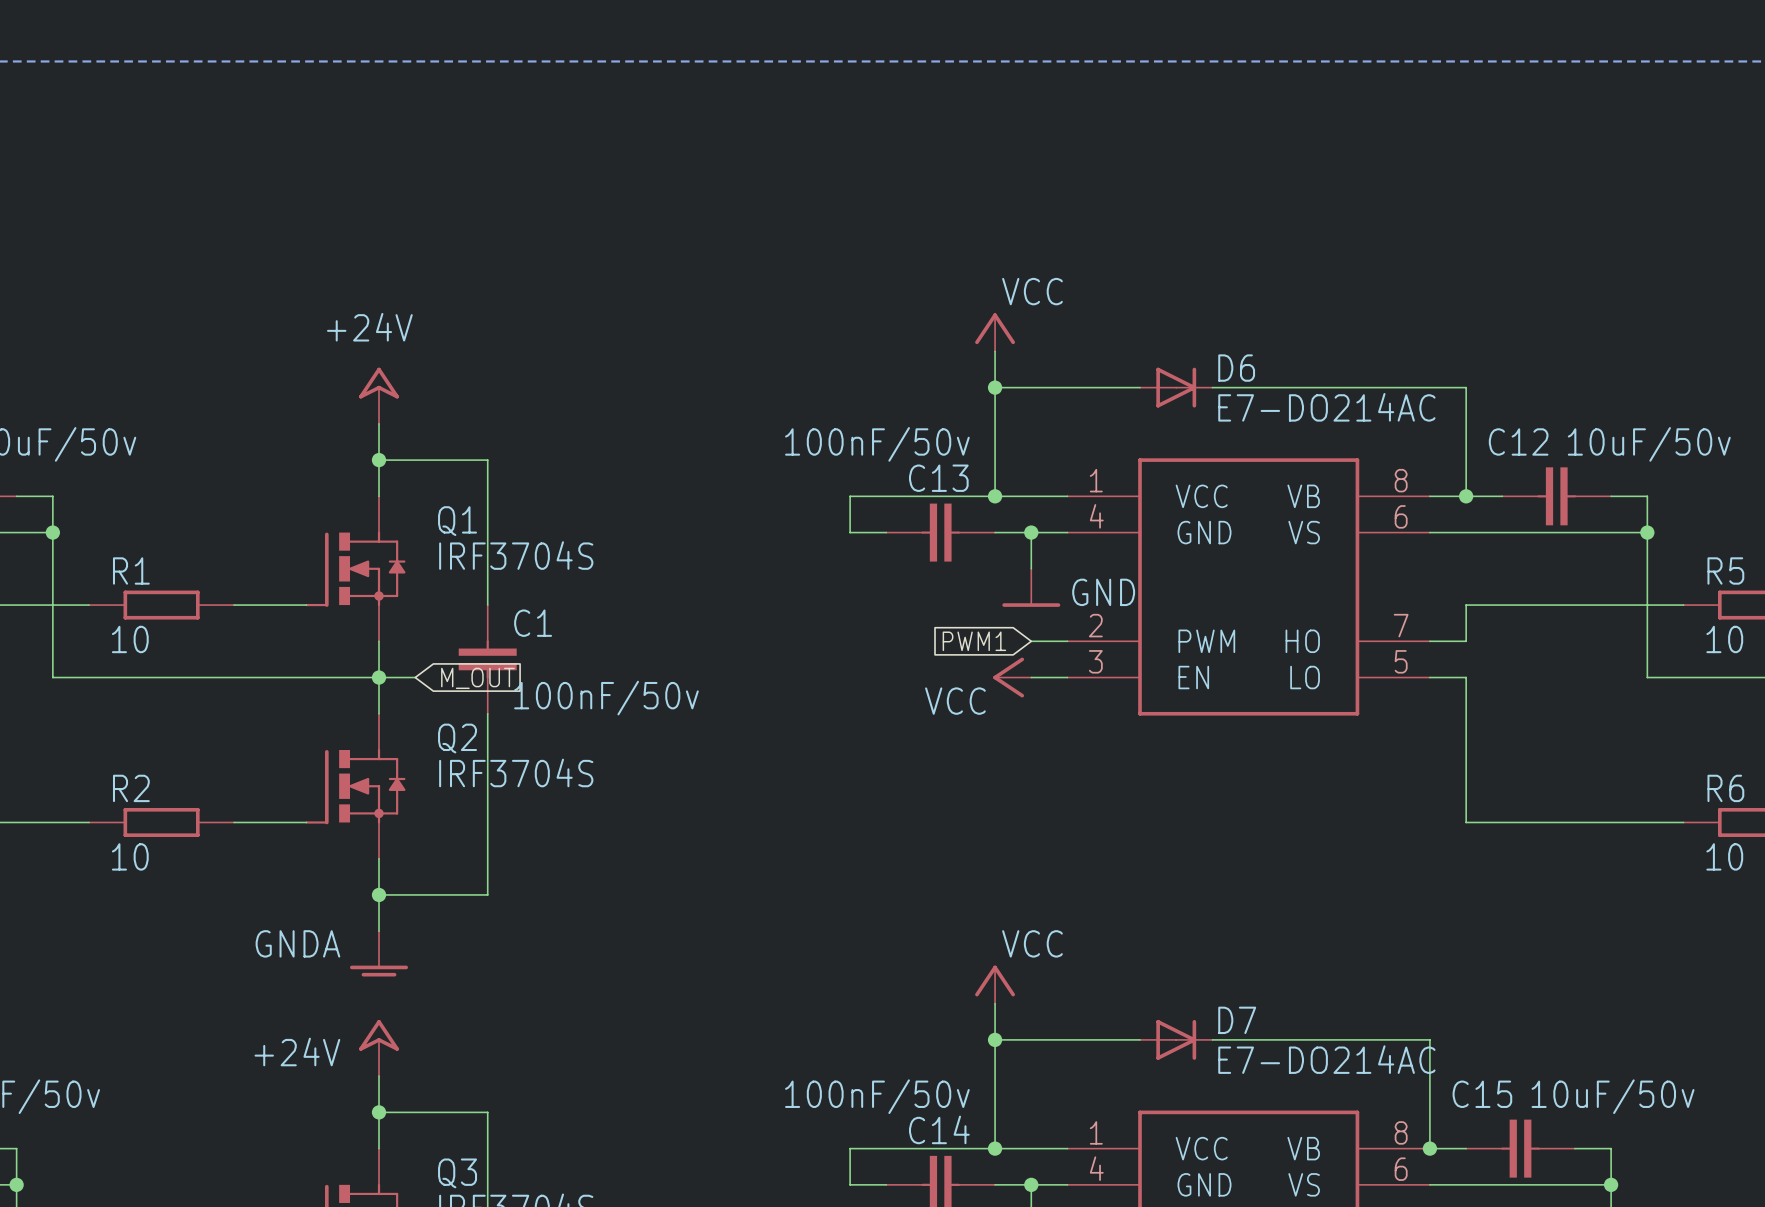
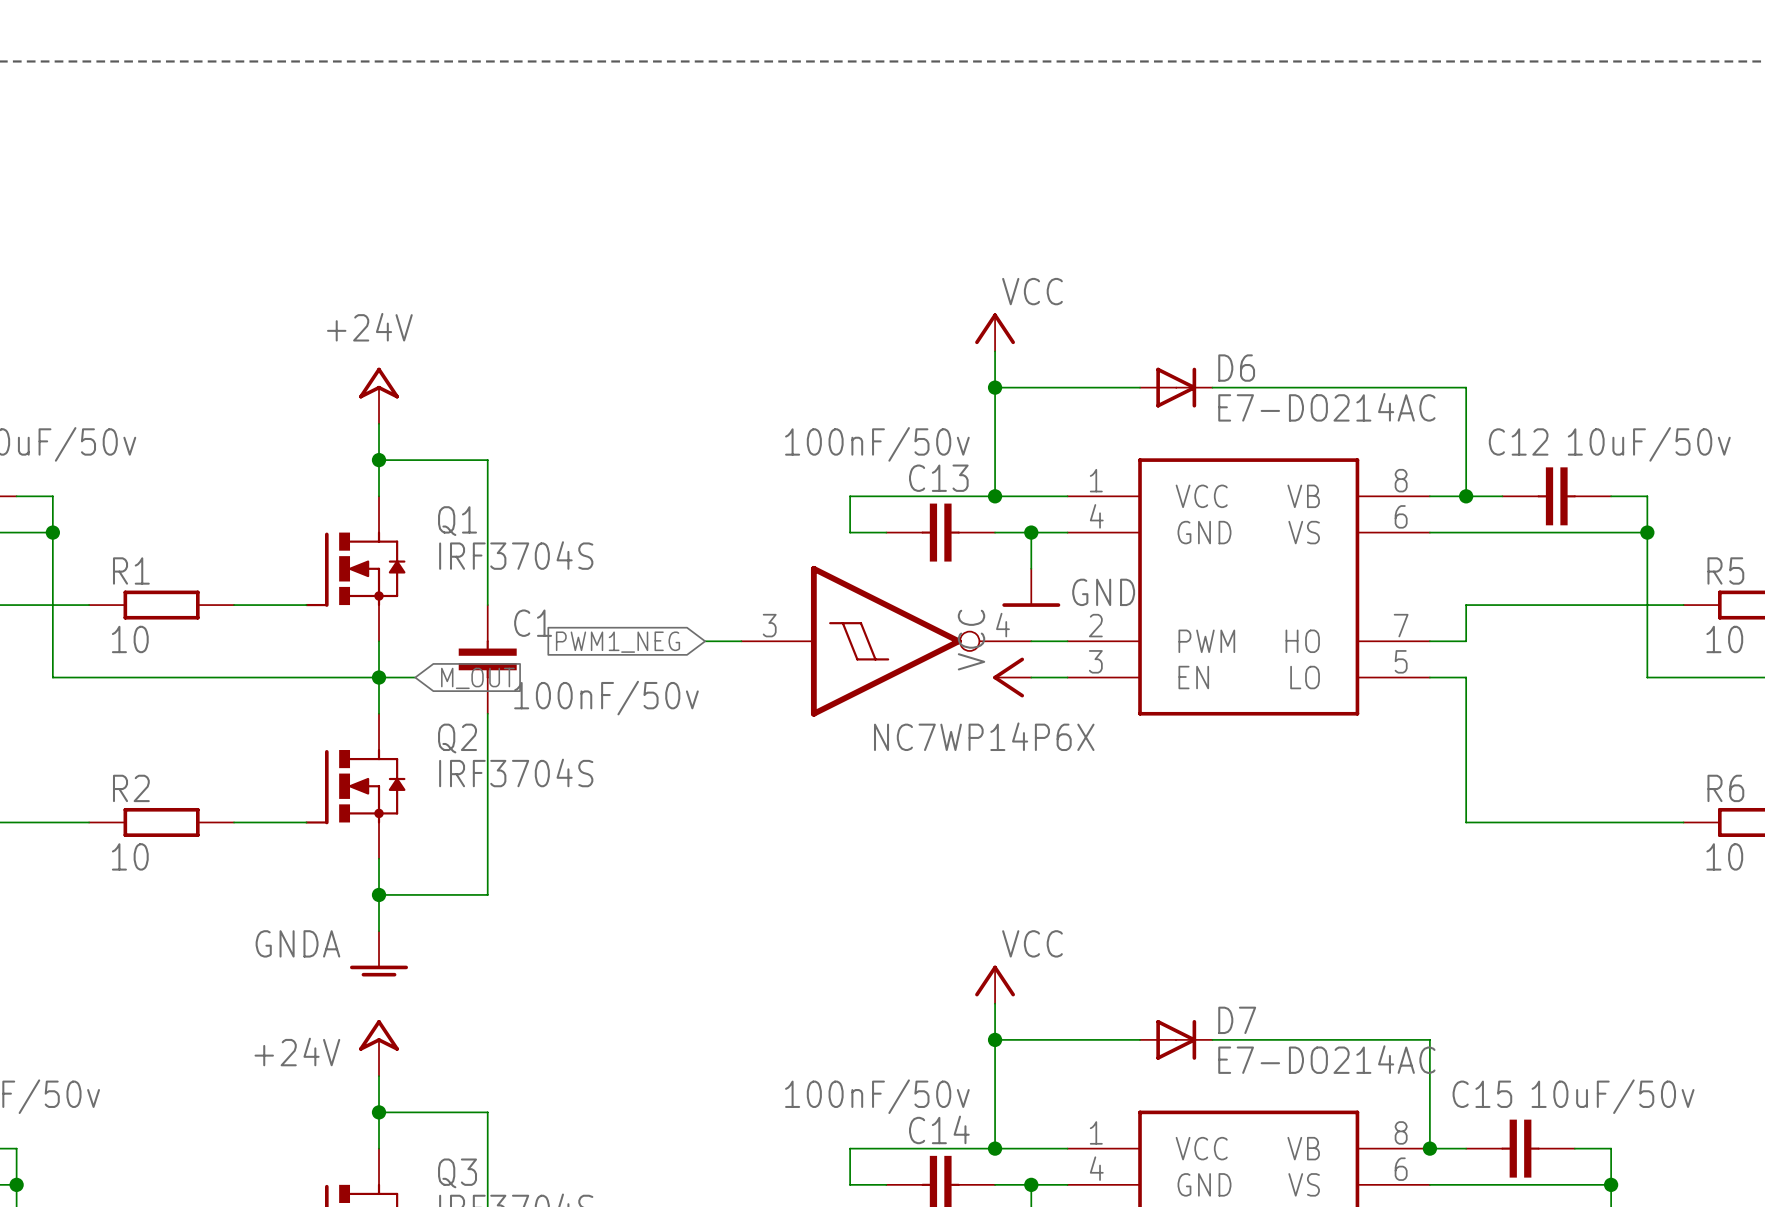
wire: none -> (705, 641) (741, 641)
part: none -> NC7WP14P6X (886, 641)
global label: PWM1 (974, 641) -> none
global label: none -> PWM1_NEG (618, 642)
power symbol text rotation: 0° (955, 701) -> 90° counterclockwise (971, 640)

